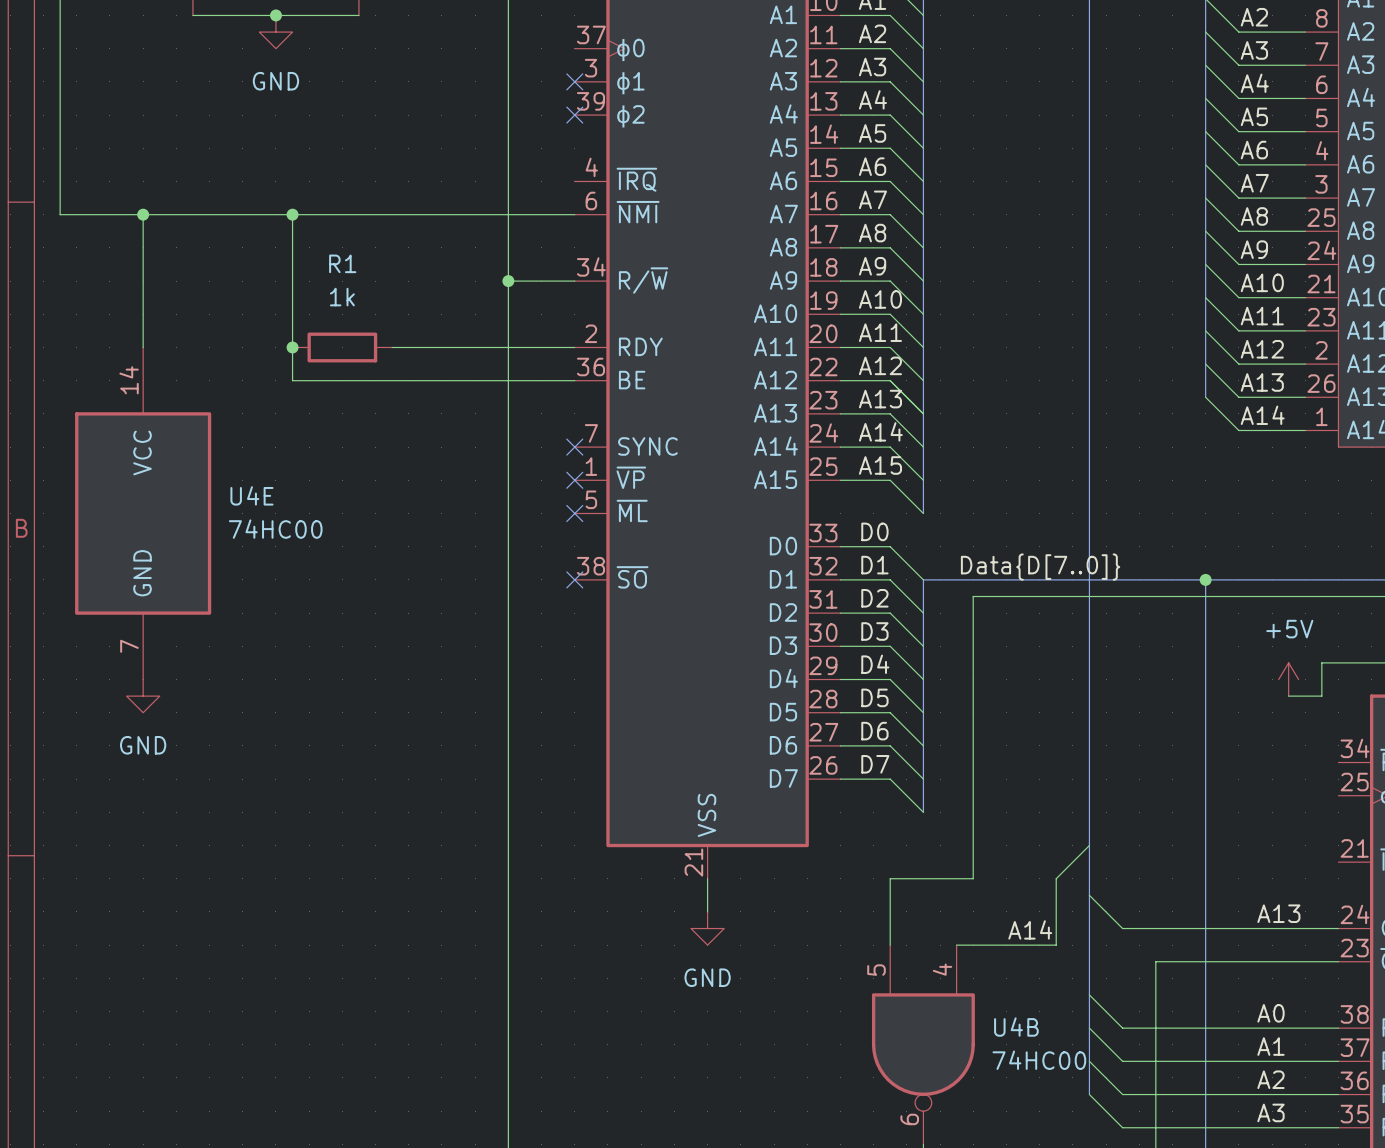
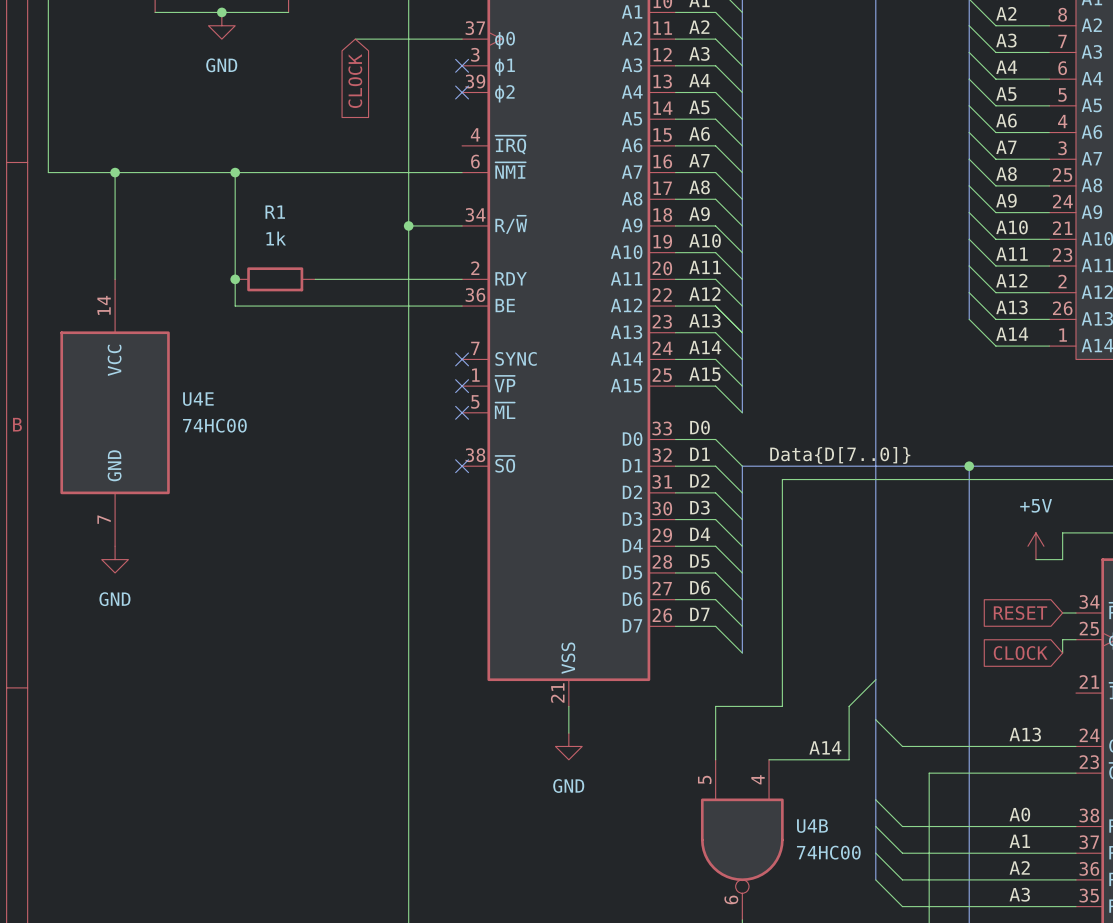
wire: none -> (355, 39) (462, 39)
global label: none -> CLOCK (355, 81)
global label: none -> RESET (1020, 613)
wire: none -> (1062, 612) (1075, 612)
wire: none -> (1075, 639) (1062, 639) (1062, 653)
global label: none -> CLOCK (1020, 653)

